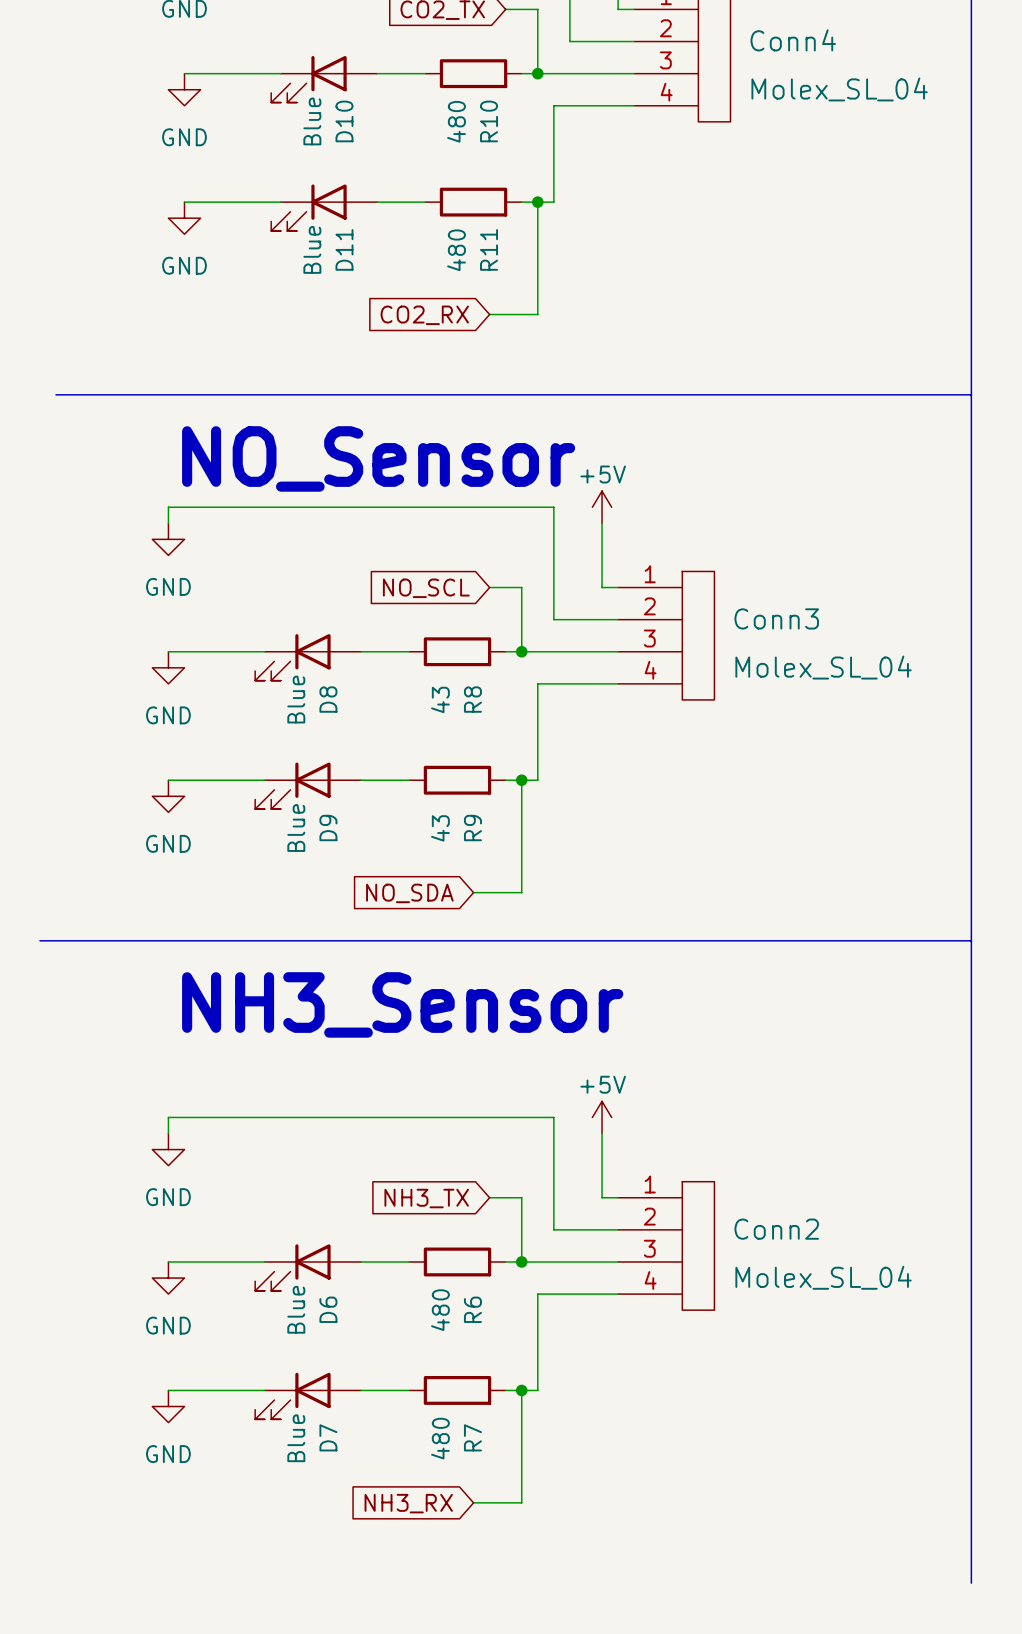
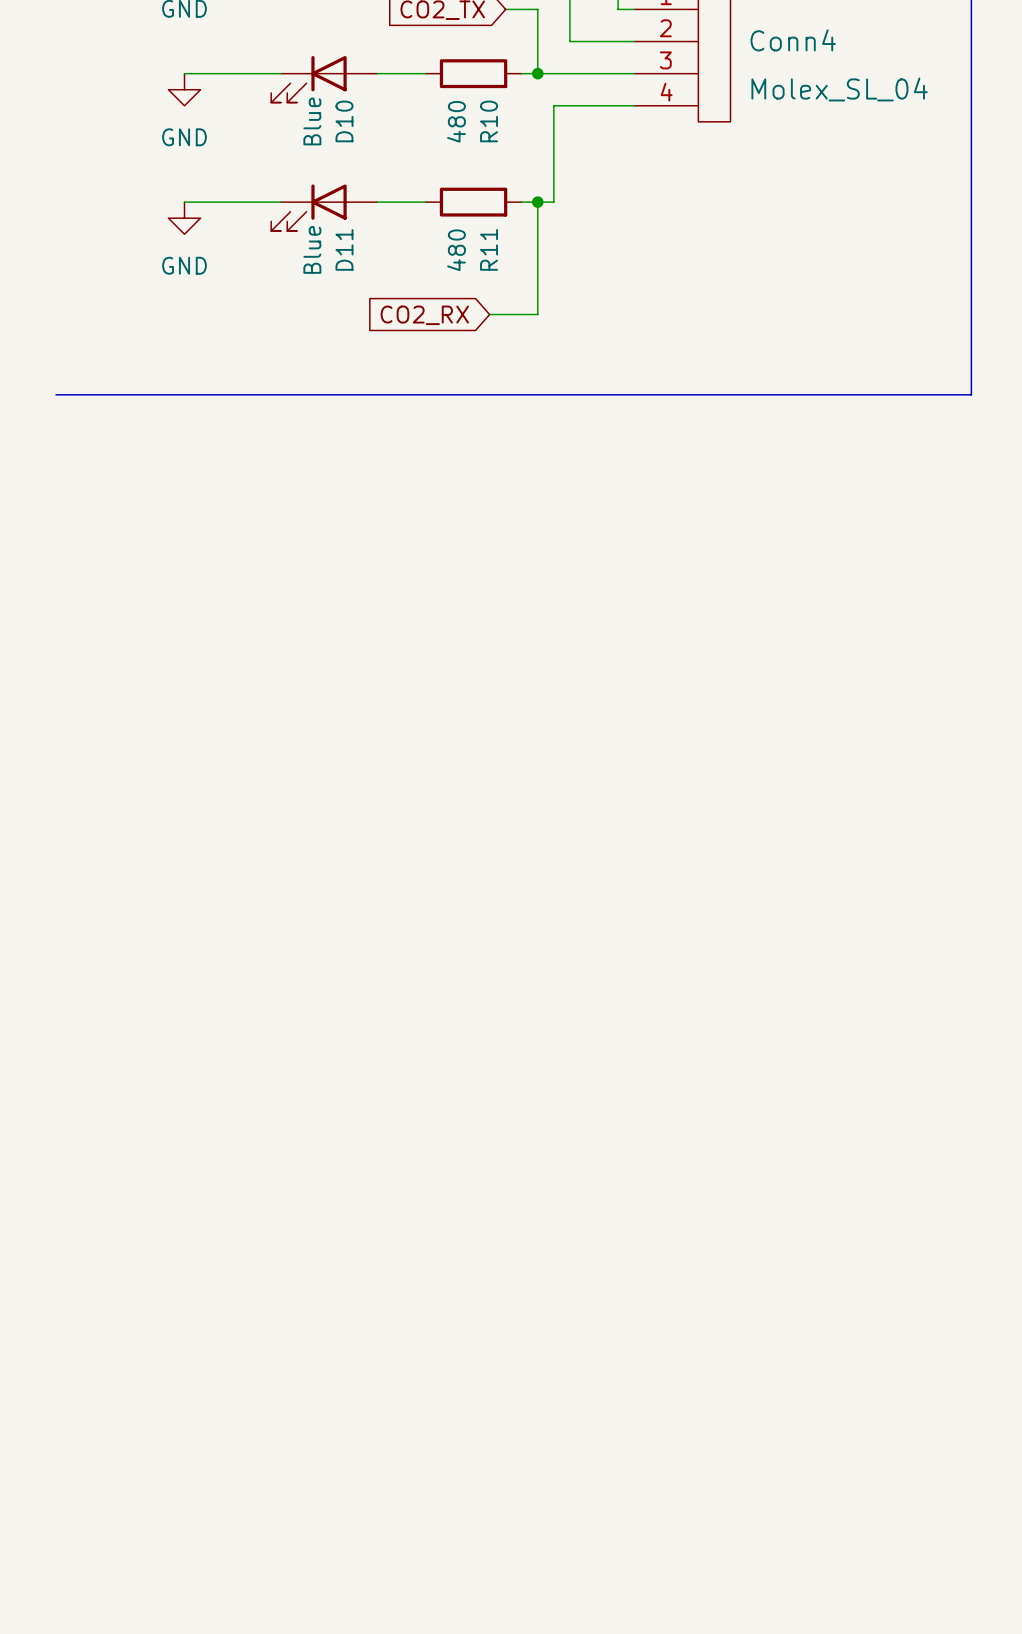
line: (971, 394) (971, 1583) -> none
text: NO_Sensor (378, 458) -> none
power symbol: +5V (602, 507) -> none
wire: (168, 523) (168, 507) (553, 507) (553, 619) (618, 619) -> none
wire: (602, 523) (602, 587) (618, 587) -> none
power symbol: GND (168, 539) -> none
wire: (489, 587) (521, 587) (521, 651) -> none
global label: NO_SCL (426, 588) -> none
Conn3: Molex_SL_04 (666, 635) -> none
wire: (168, 651) (264, 651) -> none
wire: (361, 651) (409, 651) -> none
R8: 43 (457, 651) -> none
wire: (505, 651) (618, 651) -> none
junction: (521, 651) -> none
Blue: D8 (308, 657) -> none
power symbol: GND (168, 667) -> none
wire: (618, 683) (537, 683) (537, 780) (505, 780) -> none
wire: (168, 780) (264, 780) -> none
wire: (361, 780) (409, 780) -> none
R9: 43 (457, 780) -> none
wire: (521, 780) (521, 892) (473, 892) -> none
junction: (521, 780) -> none
Blue: D9 (308, 785) -> none
power symbol: GND (168, 796) -> none
global label: NO_SDA (409, 893) -> none
line: (39, 940) (971, 940) -> none
text: NH3_Sensor (402, 1004) -> none
power symbol: +5V (602, 1117) -> none
wire: (168, 1133) (168, 1117) (553, 1117) (553, 1229) (618, 1229) -> none
wire: (602, 1133) (602, 1197) (618, 1197) -> none
power symbol: GND (168, 1149) -> none
wire: (489, 1197) (521, 1197) (521, 1261) -> none
global label: NH3_TX (426, 1198) -> none
Conn2: Molex_SL_04 (666, 1245) -> none
wire: (168, 1261) (264, 1261) -> none
wire: (361, 1261) (409, 1261) -> none
R6: 480 (457, 1261) -> none
wire: (505, 1261) (618, 1261) -> none
junction: (521, 1261) -> none
Blue: D6 (308, 1267) -> none
power symbol: GND (168, 1278) -> none
wire: (618, 1294) (537, 1294) (537, 1390) (505, 1390) -> none
wire: (168, 1390) (264, 1390) -> none
wire: (361, 1390) (409, 1390) -> none
R7: 480 (457, 1390) -> none
wire: (521, 1390) (521, 1502) (473, 1502) -> none
junction: (521, 1390) -> none
Blue: D7 (308, 1396) -> none
power symbol: GND (168, 1406) -> none
global label: NH3_RX (408, 1503) -> none

